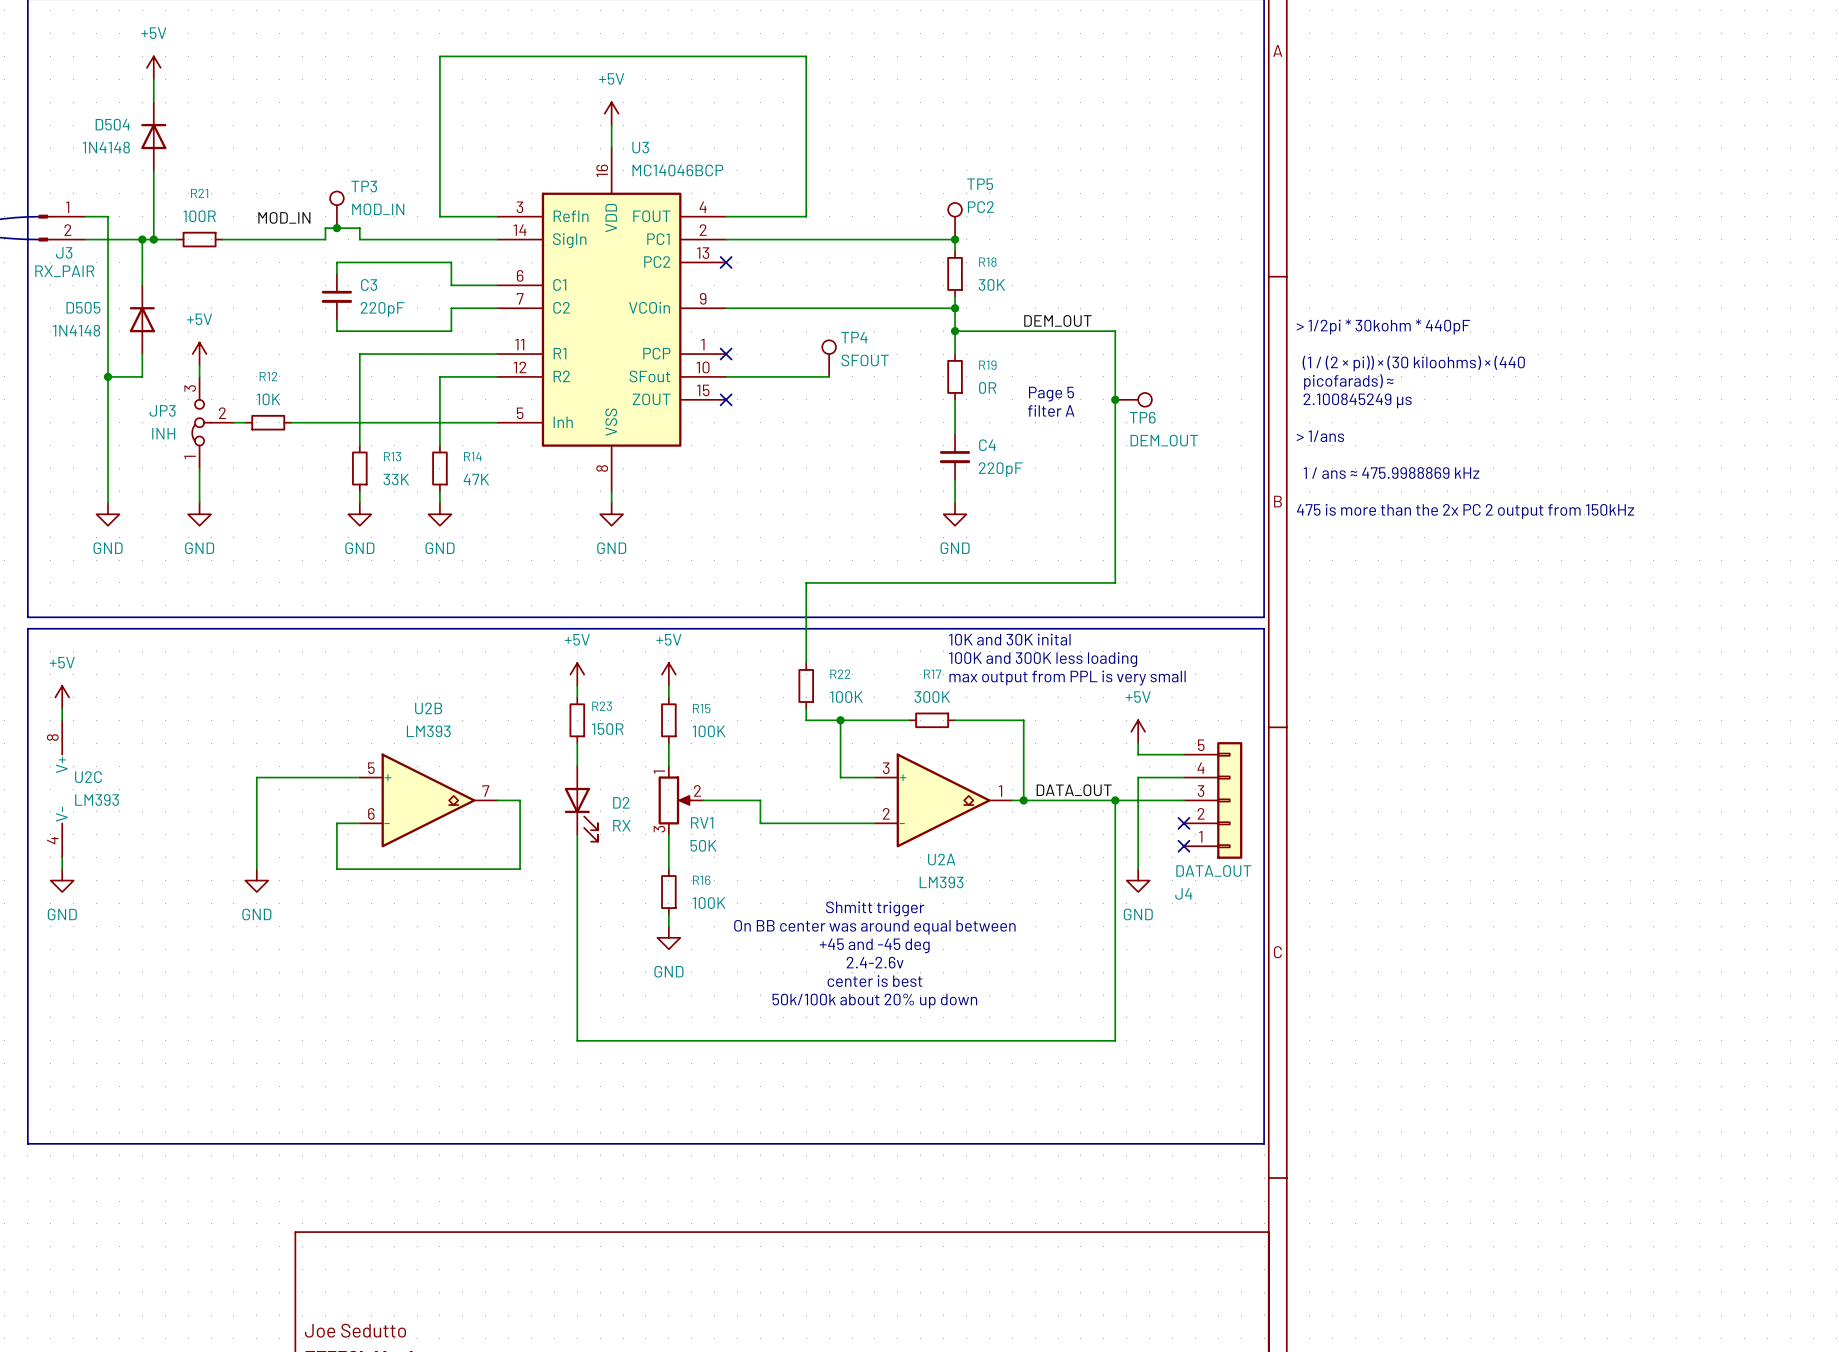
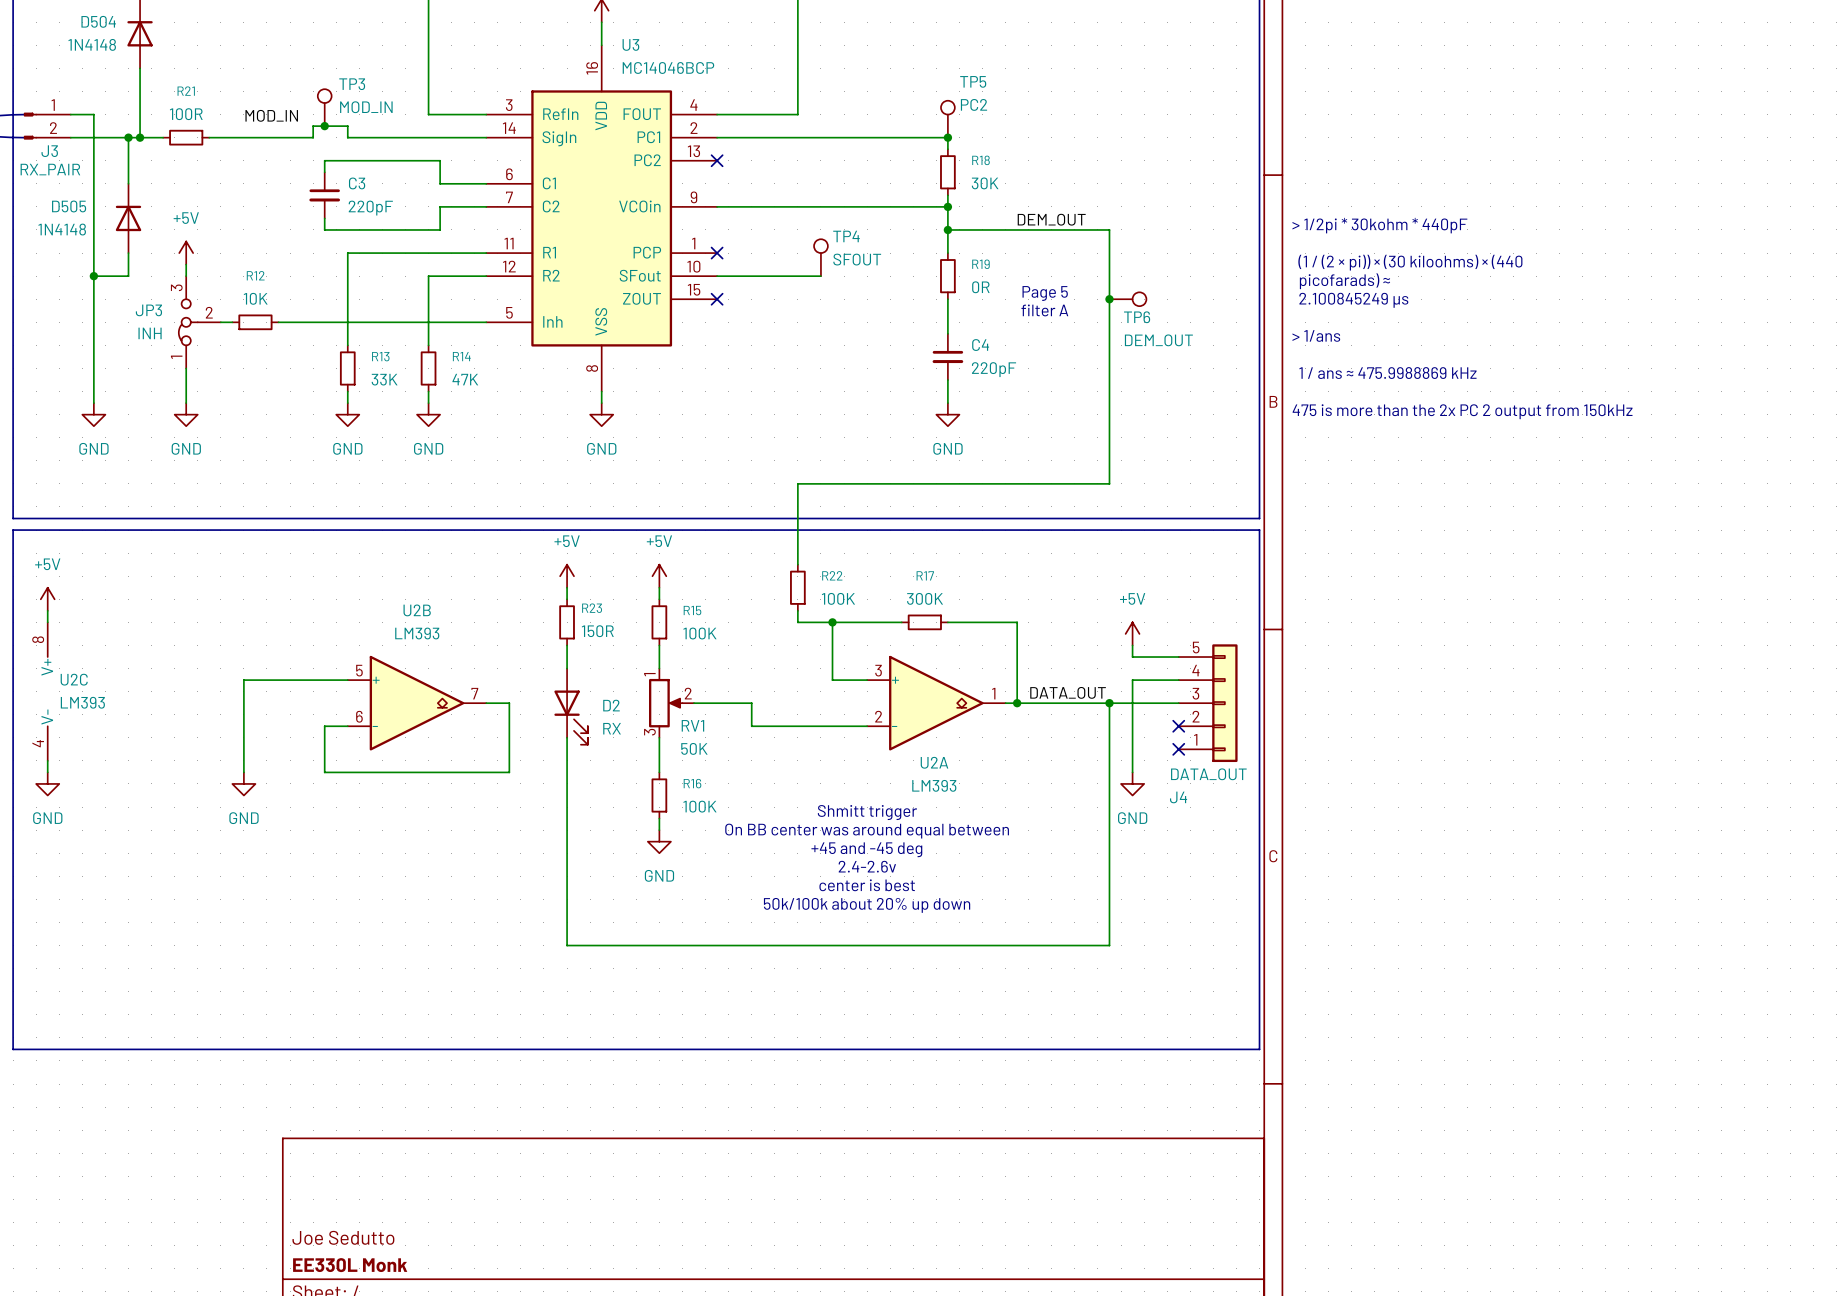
text: 10K and 30K inital (1009, 639) -> none
text: 100K and 300K less loading (1043, 659) -> none
text: max output from PPL is very small (1067, 678) -> none

